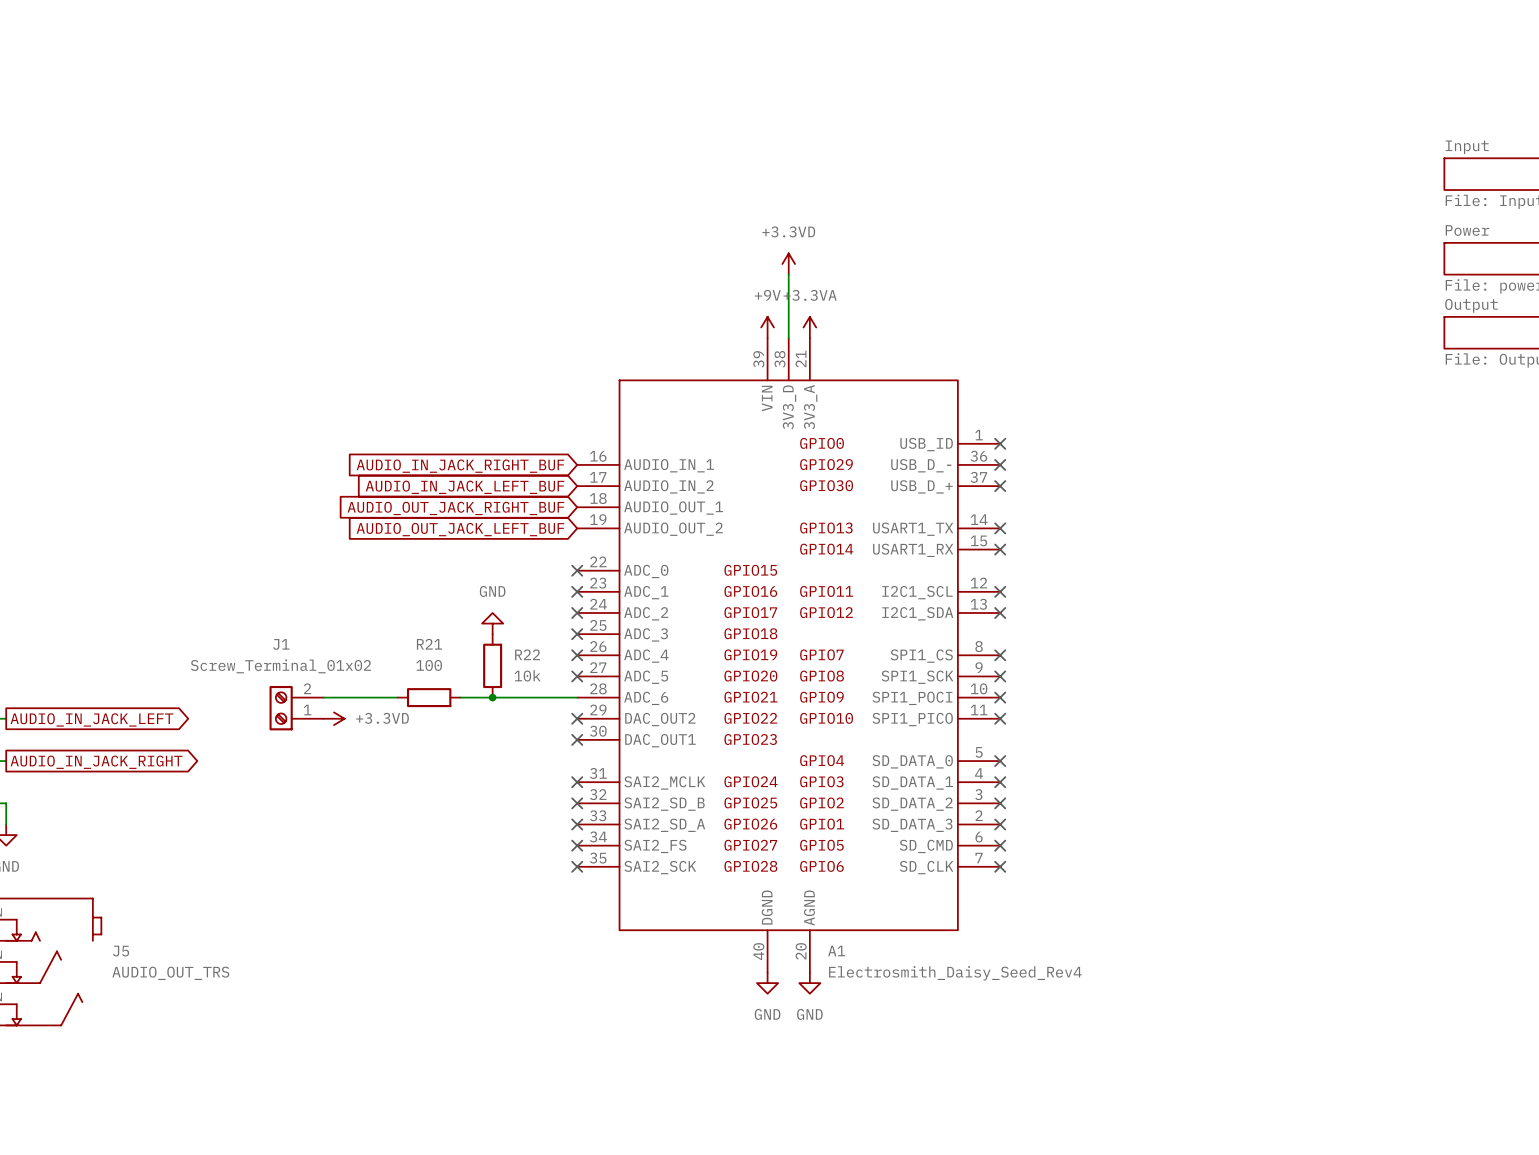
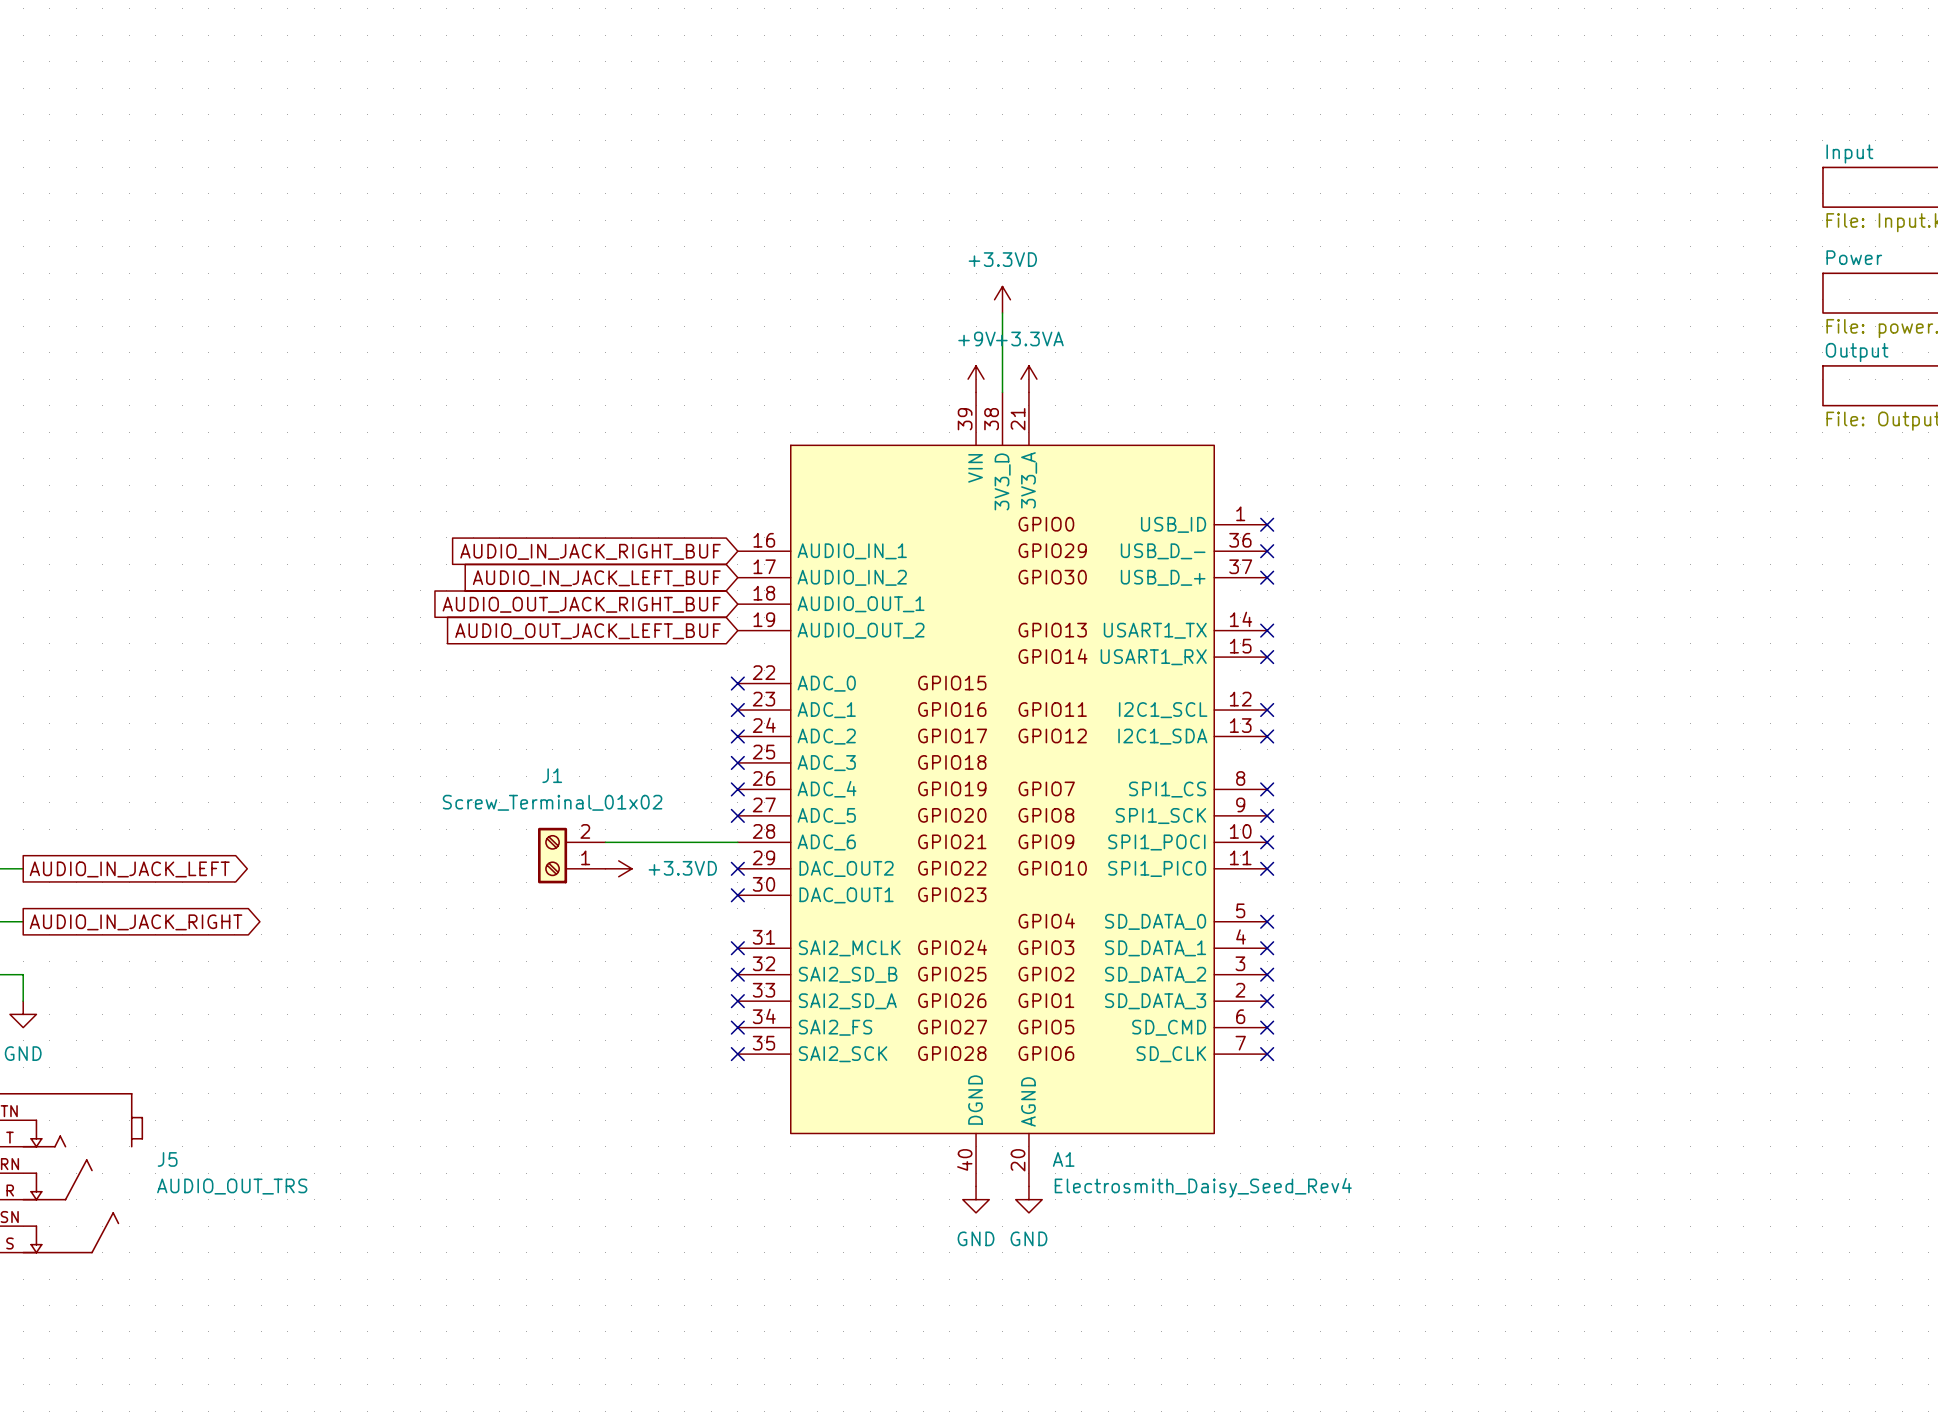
power symbol: GND (492, 623) -> none
R22: 10k (492, 665) -> none
wire: (323, 697) (397, 697) -> none
R21: 100 (429, 697) -> none
junction: (492, 697) -> none
J1 position: (296, 708) -> (571, 855)
power symbol position: +3.3VD (334, 718) -> +3.3VD (618, 868)

